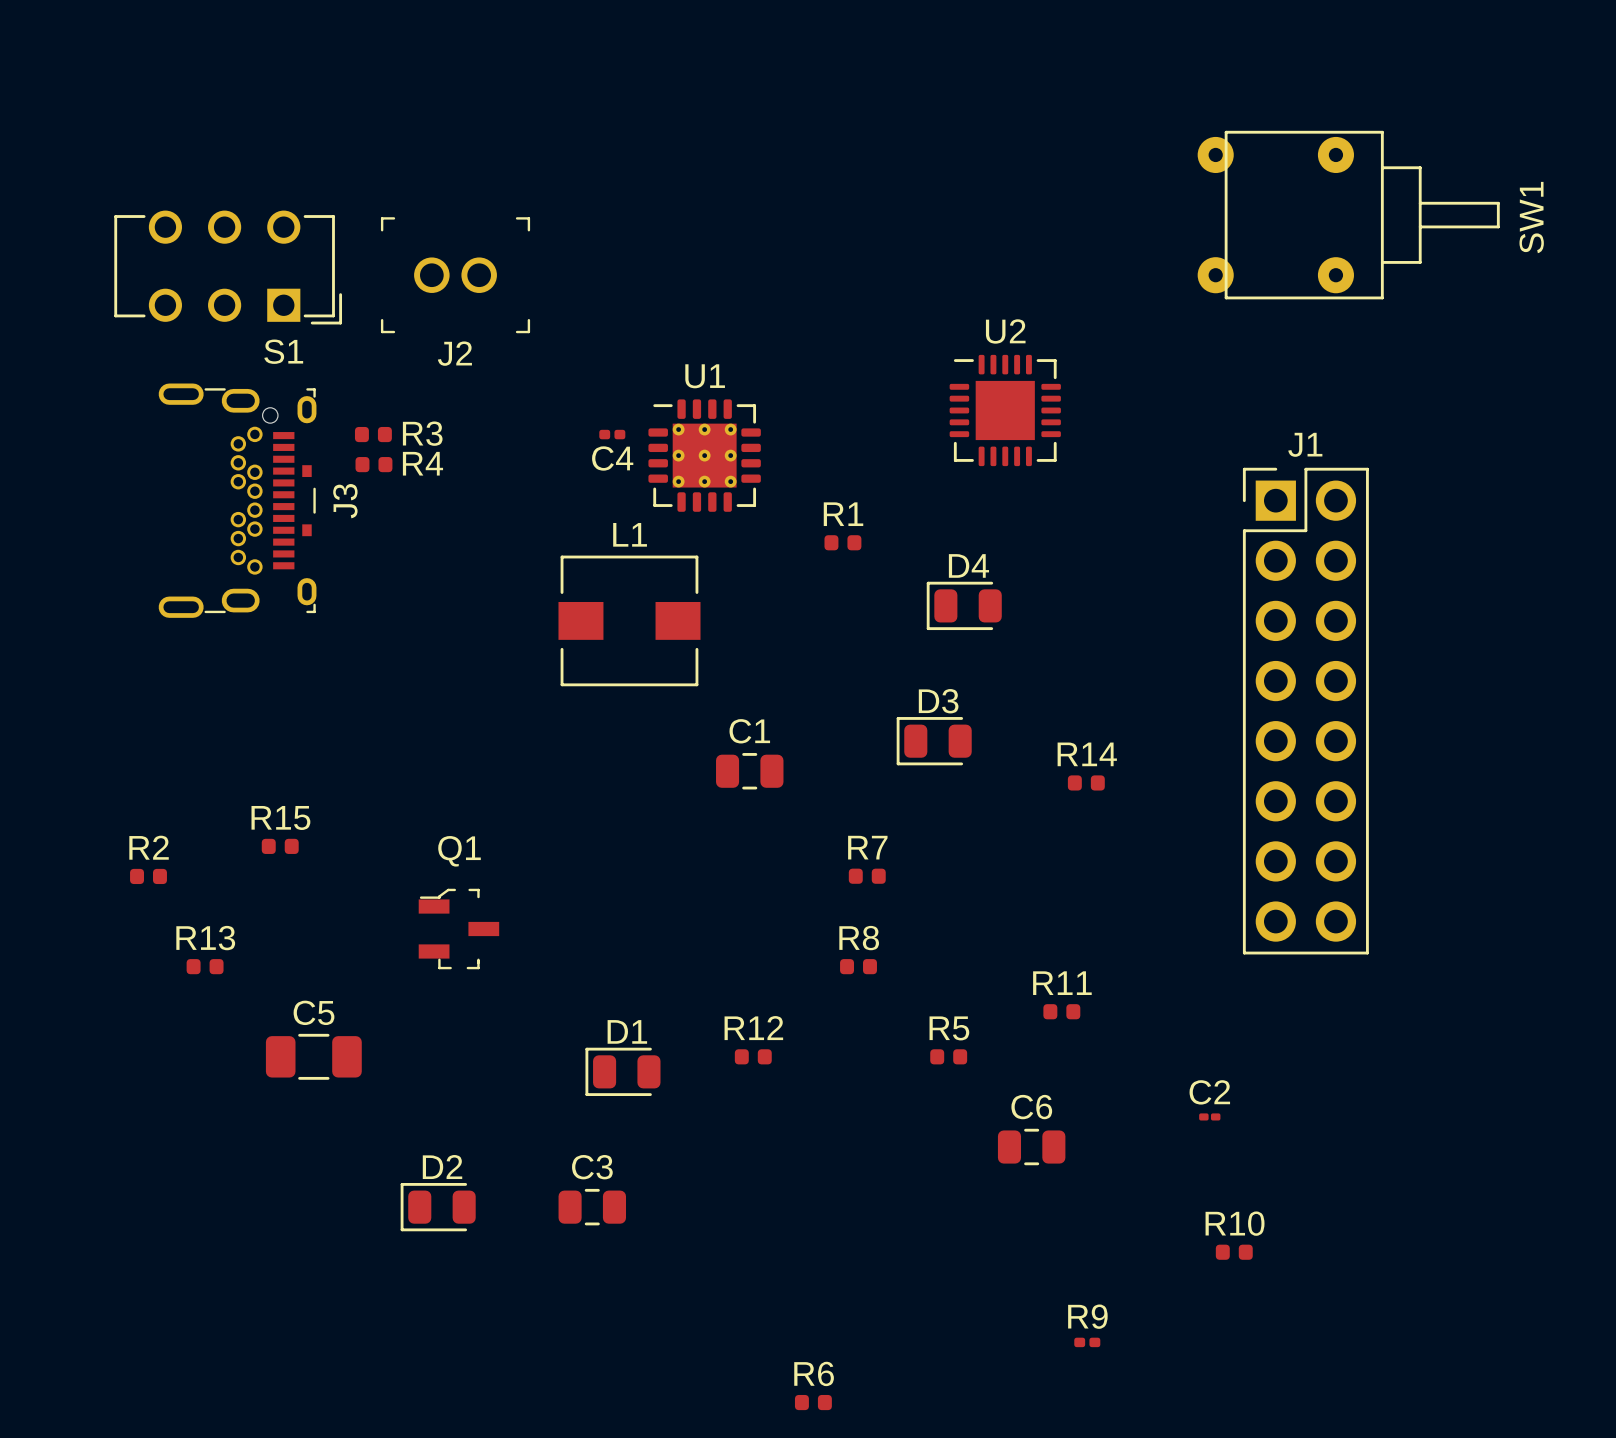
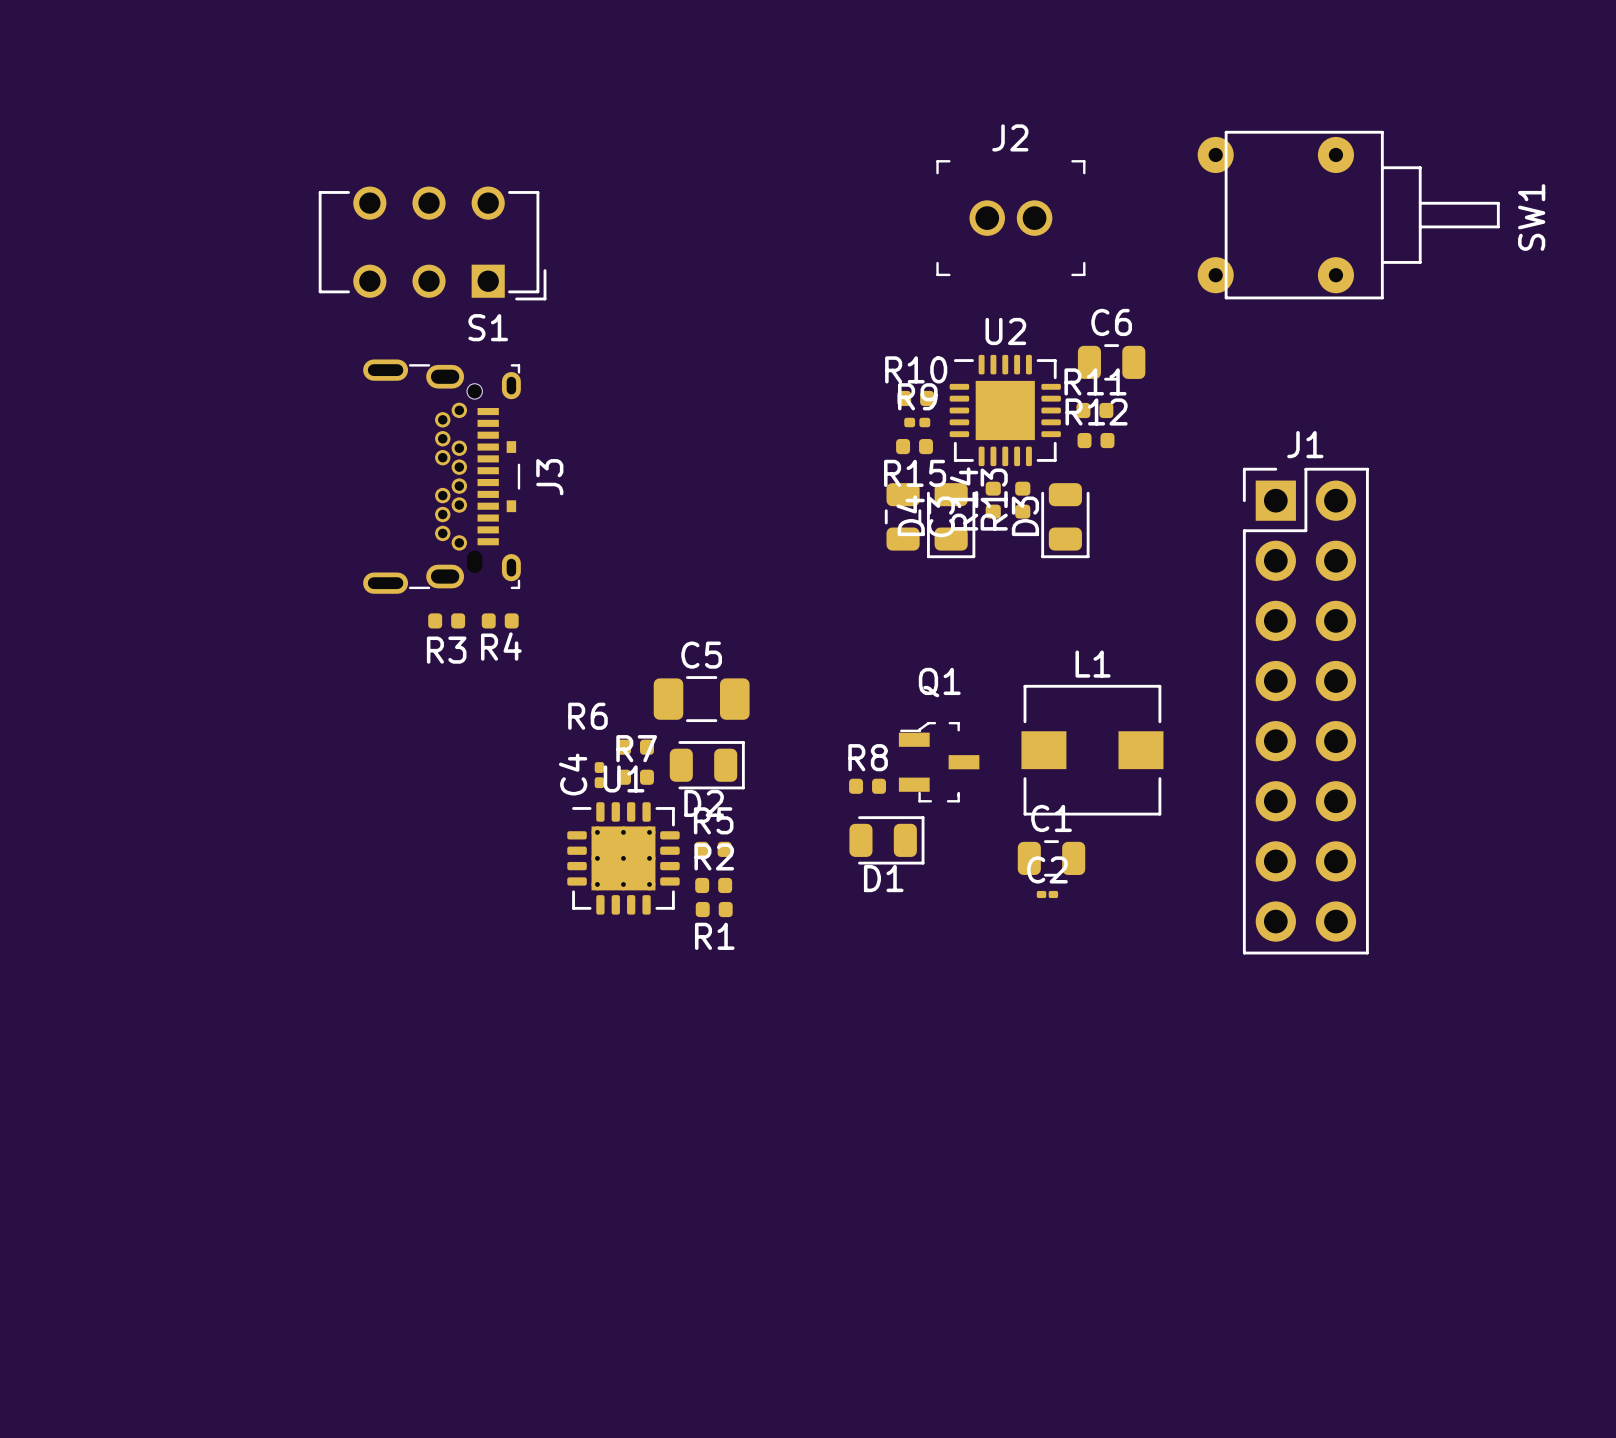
S1 position: (228, 267) -> (432, 243)
J2 position: (455, 275) -> (1010, 218)
J2 name position: J2 (454, 353) -> J2 (1010, 137)
R3 name position: R3 (422, 433) -> R3 (446, 650)
R3 position: (373, 434) -> (446, 620)
C4 rotation: 0° (612, 434) -> 90° clockwise (599, 775)
C4 position: (612, 434) -> (599, 775)
U1 position: (704, 455) -> (623, 858)
R4 name position: R4 (422, 463) -> R4 (501, 646)
R4 position: (373, 464) -> (500, 620)
J3 position: (237, 500) -> (441, 476)
R1 name position: R1 (843, 514) -> R1 (714, 936)
R1 position: (842, 542) -> (714, 909)
D4 rotation: 0° (964, 605) -> 90° counterclockwise (951, 520)
D4 position: (964, 605) -> (951, 520)
L1 position: (629, 620) -> (1092, 750)
D3 rotation: 0° (934, 741) -> 90° counterclockwise (1065, 520)
D3 position: (934, 741) -> (1065, 520)
C1 position: (749, 771) -> (1051, 858)
R14 rotation: 0° (1086, 782) -> 90° clockwise (993, 500)
R14 position: (1086, 782) -> (993, 500)
R15 name position: R15 (280, 817) -> R15 (915, 473)
R15 position: (280, 846) -> (914, 446)
R2 position: (148, 876) -> (713, 885)
R7 position: (867, 876) -> (635, 777)
Q1 position: (458, 929) -> (939, 762)
R13 rotation: 0° (205, 966) -> 90° clockwise (1022, 500)
R13 position: (205, 966) -> (1022, 500)
R8 position: (858, 966) -> (867, 786)
R11 position: (1061, 1011) -> (1094, 410)
C5 position: (313, 1056) -> (701, 699)
R12 position: (753, 1056) -> (1096, 440)
R5 position: (948, 1056) -> (713, 849)
D1 rotation: 0° (622, 1071) -> 180° (886, 840)
D1 position: (622, 1071) -> (886, 840)
C2 position: (1209, 1116) -> (1047, 894)
C6 position: (1031, 1147) -> (1111, 362)
D2 rotation: 0° (438, 1207) -> 180° (707, 765)
D2 position: (438, 1207) -> (707, 765)
C3 rotation: 0° (592, 1207) -> 90° clockwise (903, 516)
C3 position: (592, 1207) -> (903, 516)
R10 position: (1234, 1252) -> (915, 398)
R9 position: (1087, 1342) -> (917, 422)
R6 name position: R6 (814, 1373) -> R6 (587, 716)
R6 position: (813, 1402) -> (635, 747)

